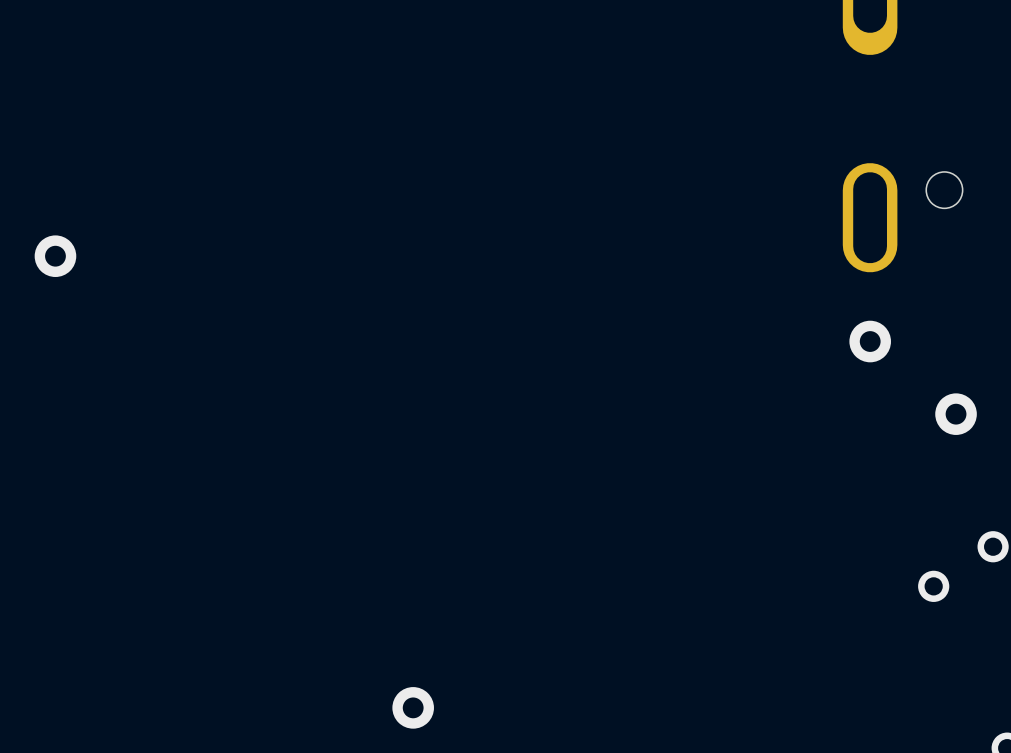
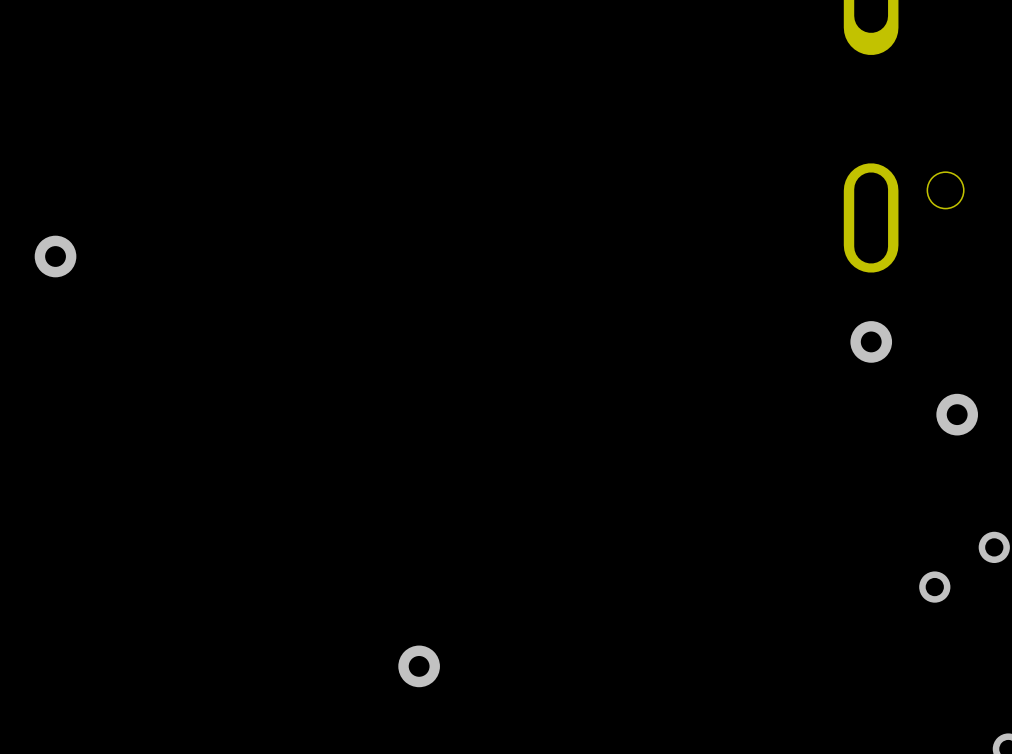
via position: (413, 707) -> (419, 666)

